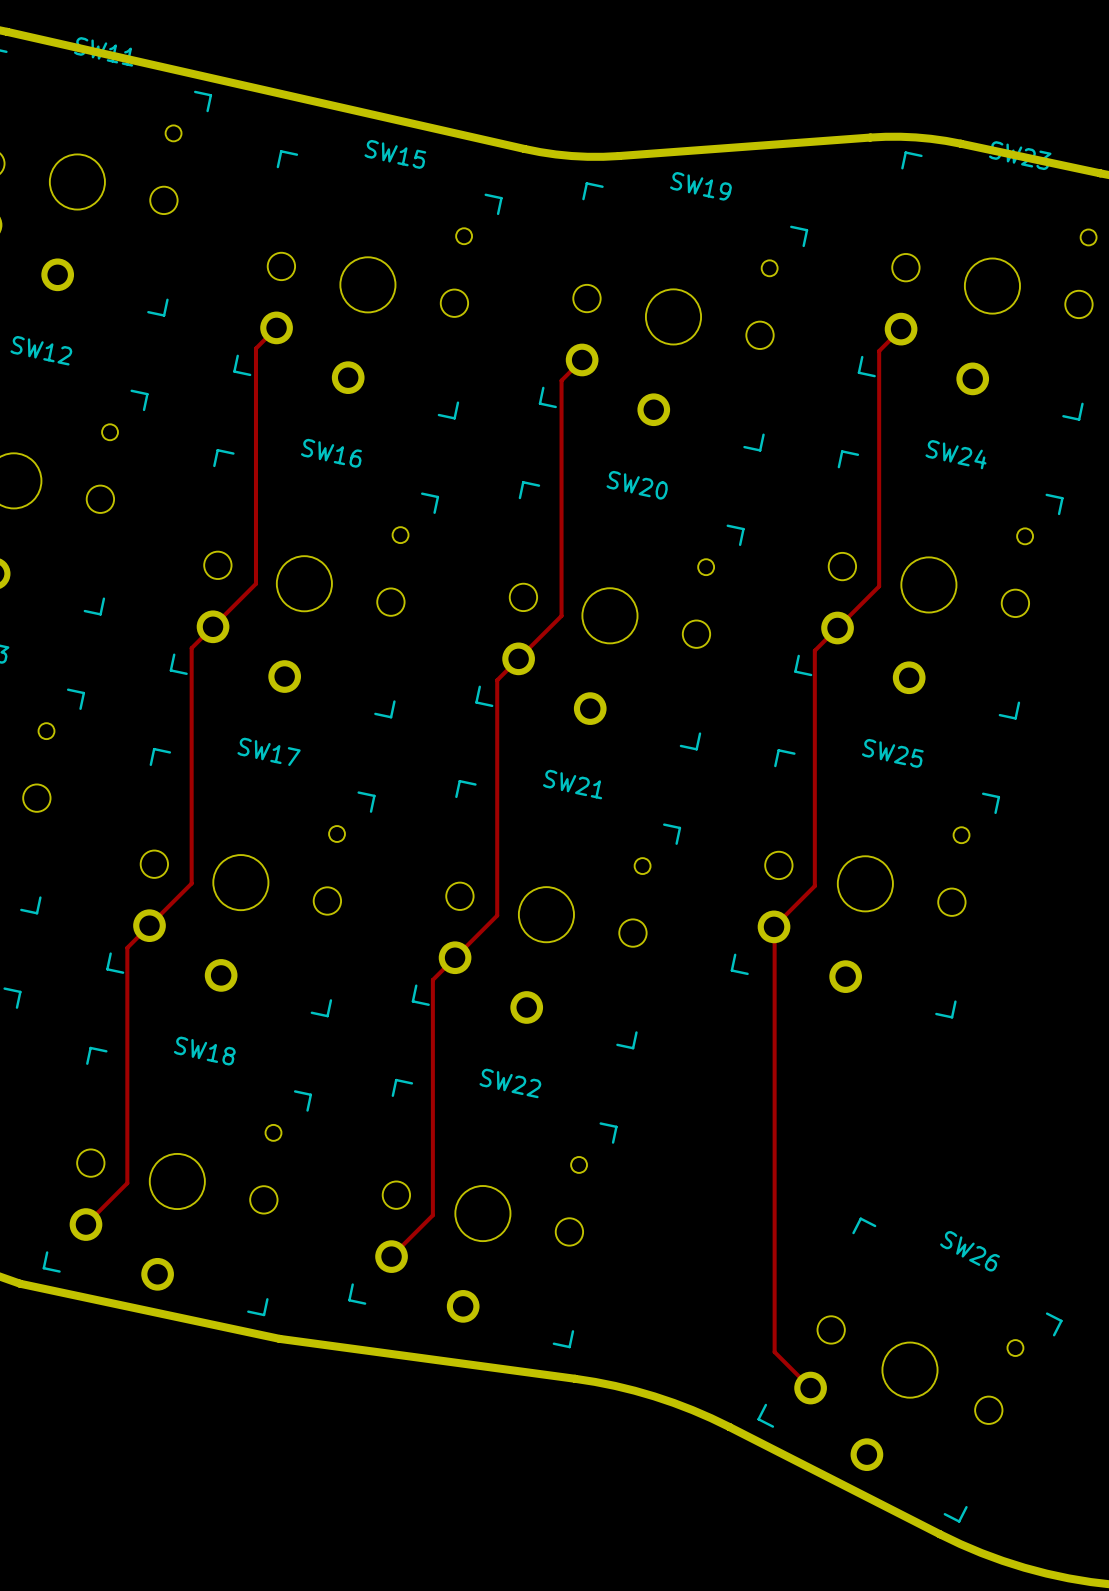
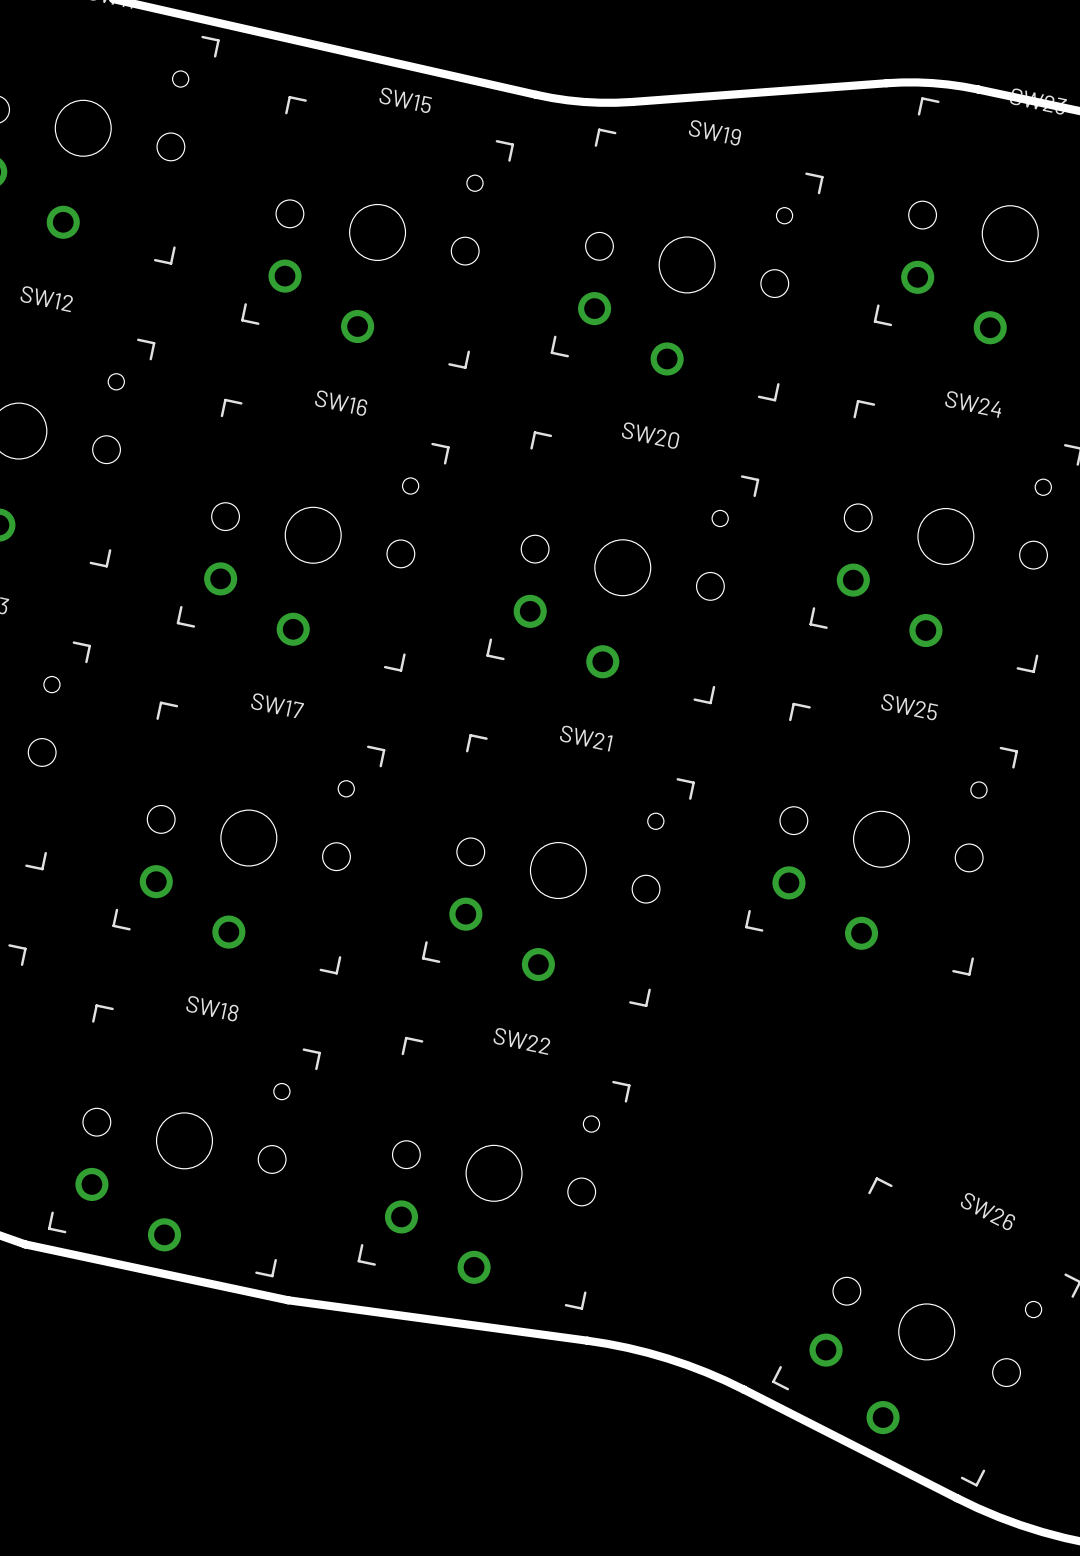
track: (276, 327) (255, 348) (255, 583) (191, 648) (191, 883) (127, 947) (127, 1183) (85, 1224) -> none
track: (901, 329) (879, 351) (879, 586) (814, 650) (814, 886) (774, 926) (774, 1352) (810, 1388) -> none
track: (582, 359) (561, 380) (561, 615) (497, 680) (497, 915) (432, 979) (432, 1215) (391, 1256) -> none

